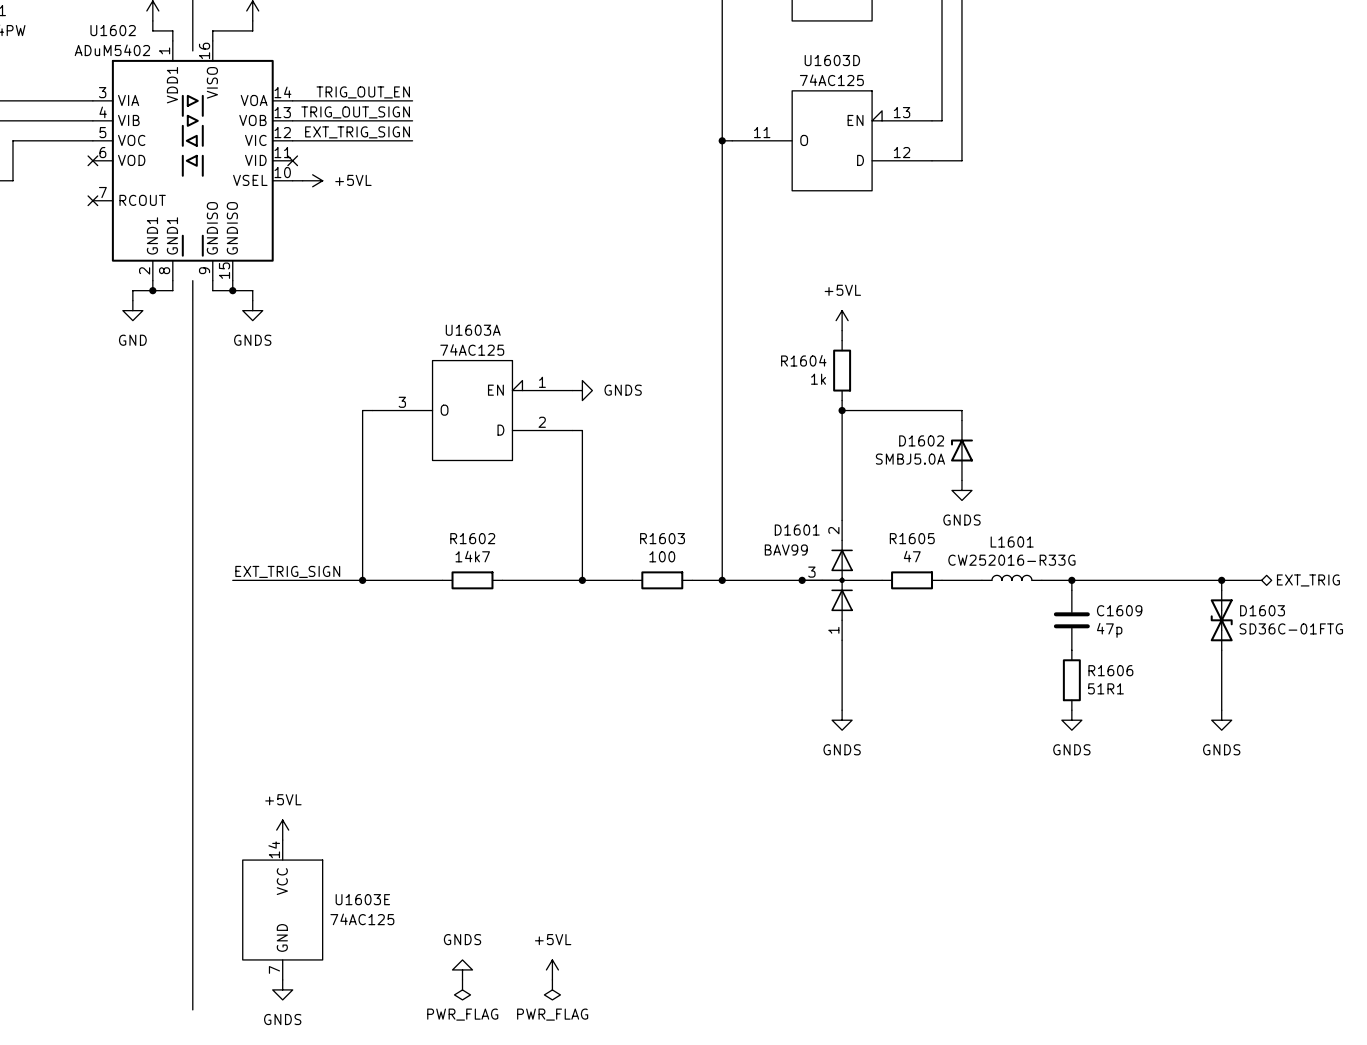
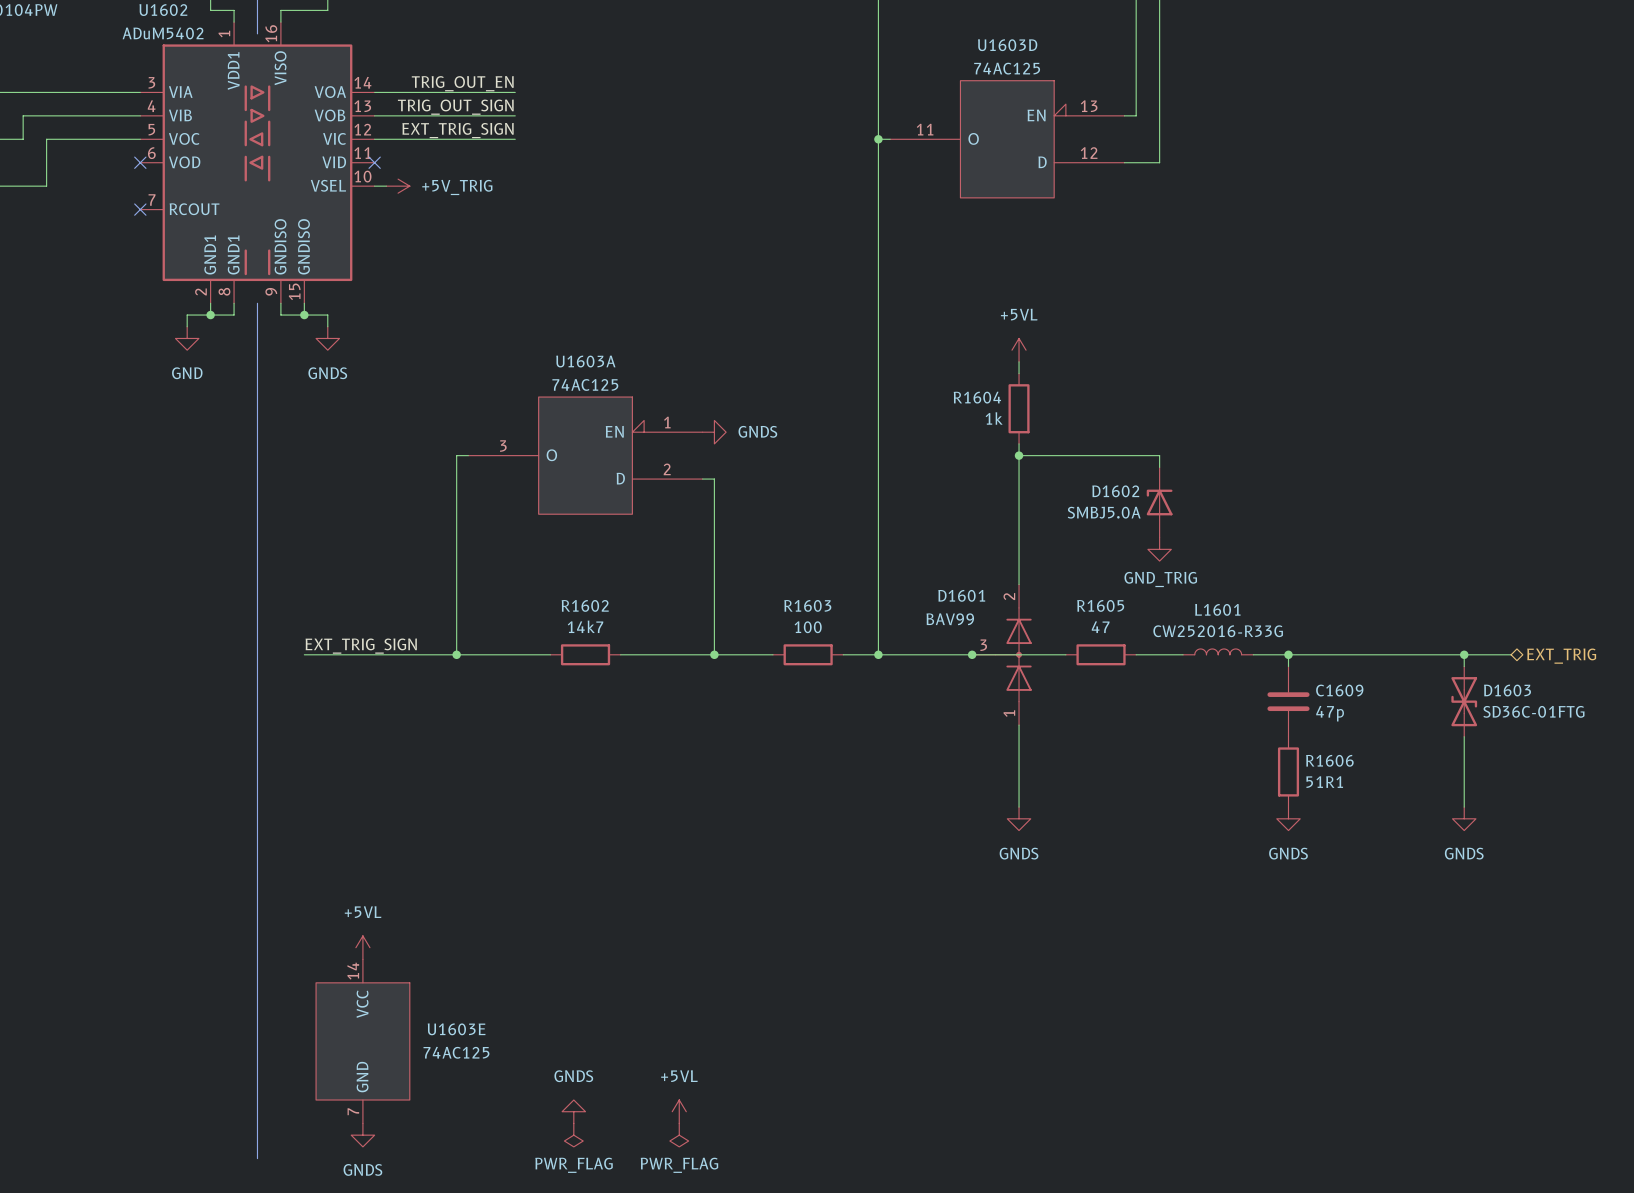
power symbol: +5VL (312, 180) -> +5V_TRIG (398, 186)
power symbol: GNDS (961, 490) -> GND_TRIG (1159, 549)

